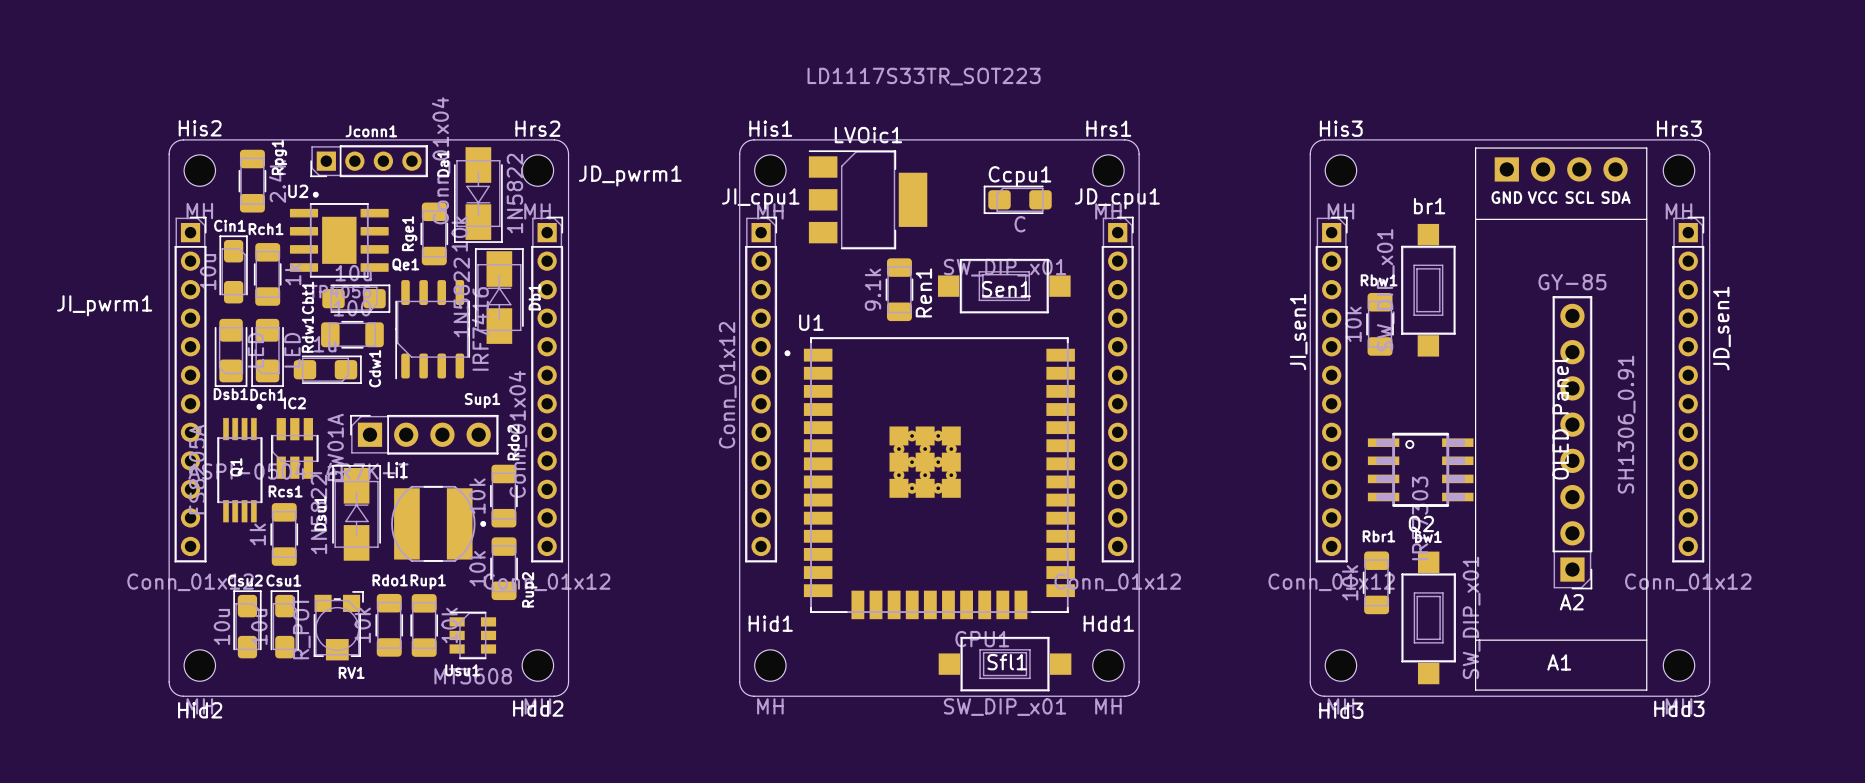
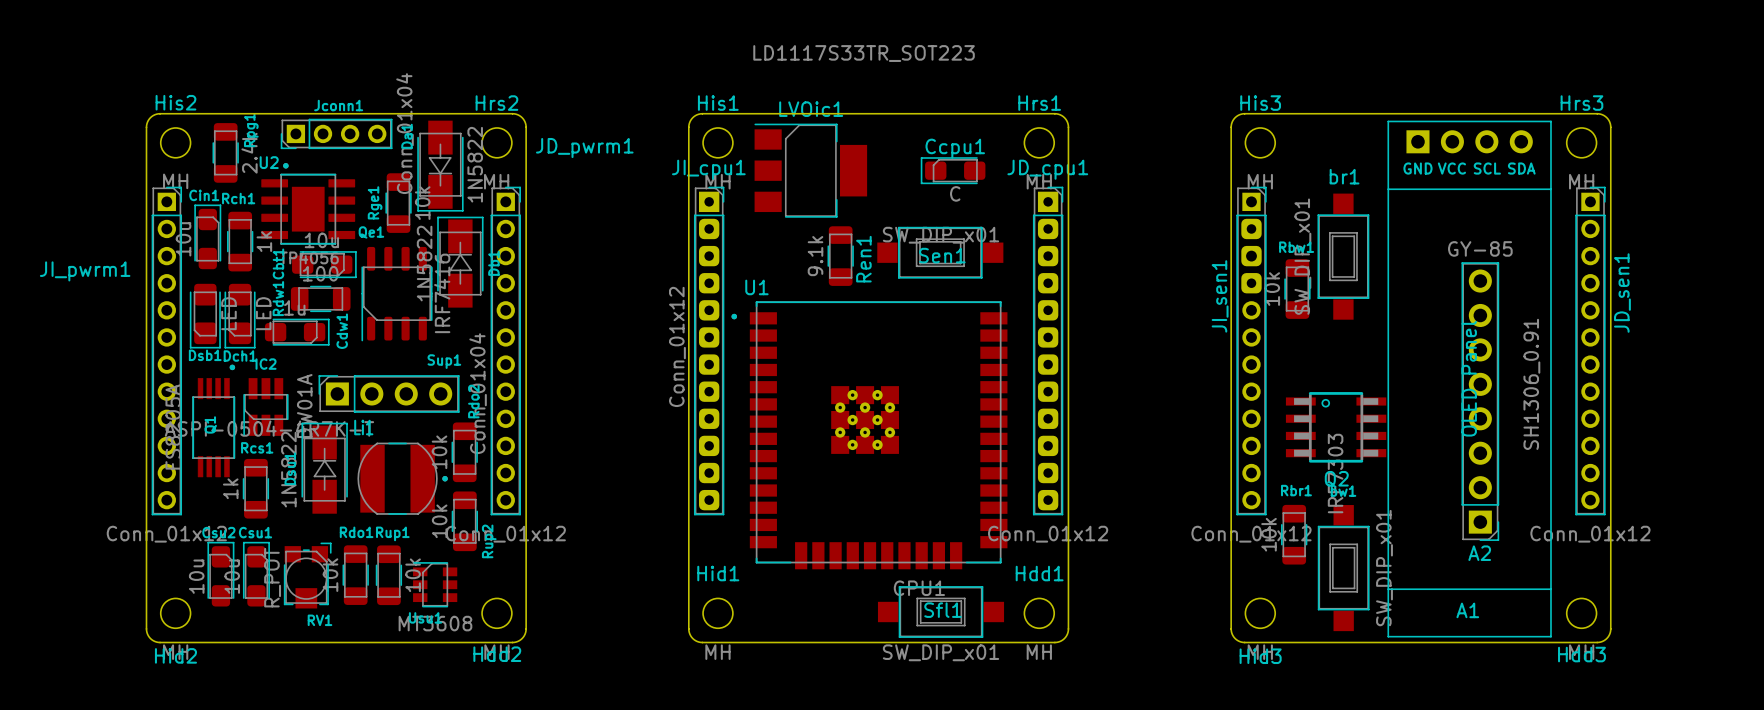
JI_cpu1 footprint: [745, 216, 778, 563] -> [693, 186, 725, 516]
JD_cpu1 footprint: [1101, 216, 1134, 563] -> [1032, 186, 1064, 516]
JI_sen1 footprint: [1315, 216, 1348, 563] -> [1236, 186, 1267, 516]

